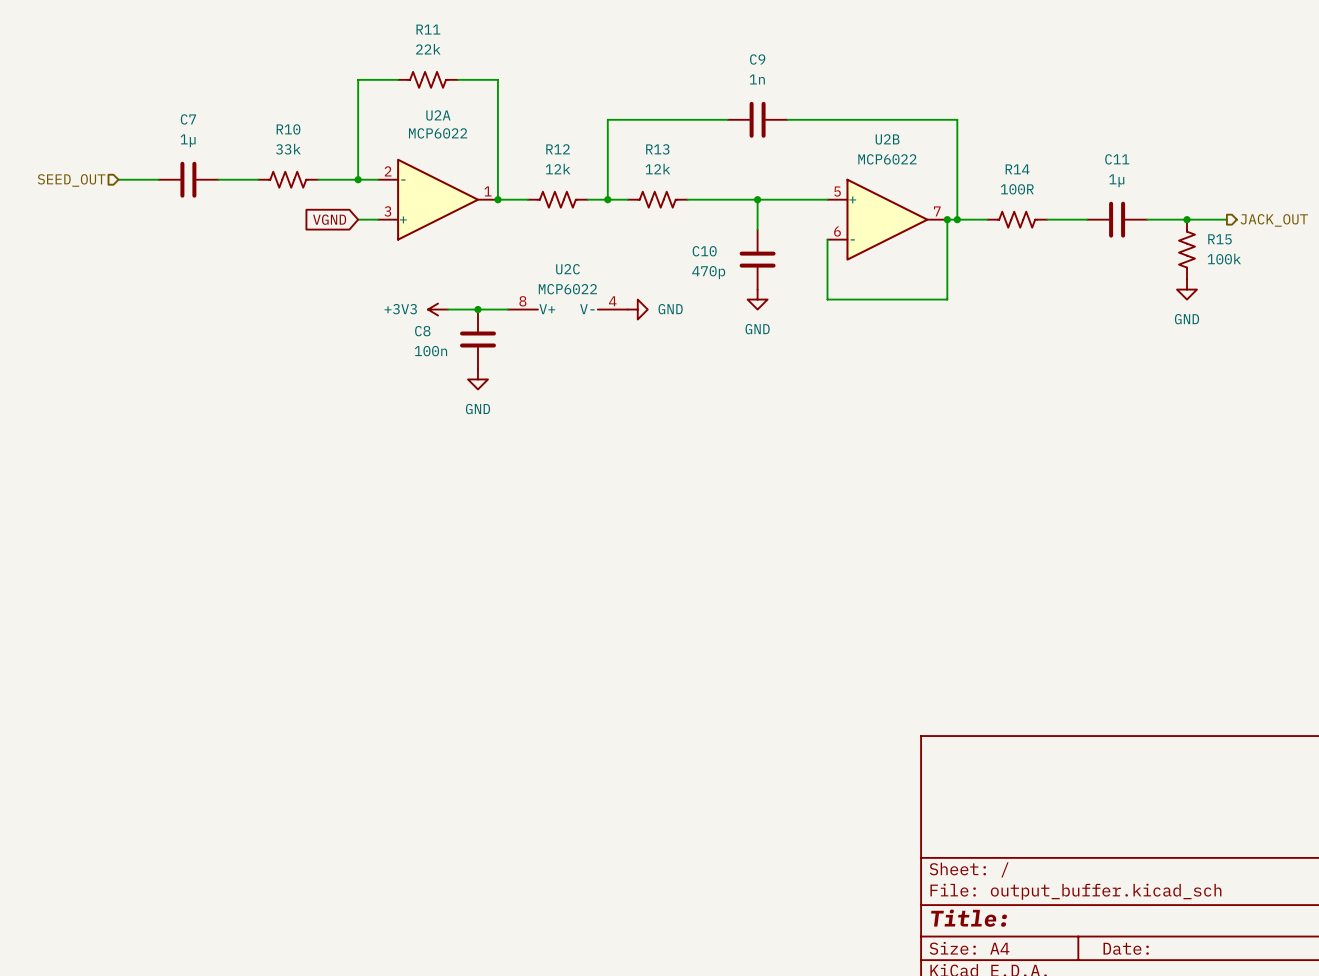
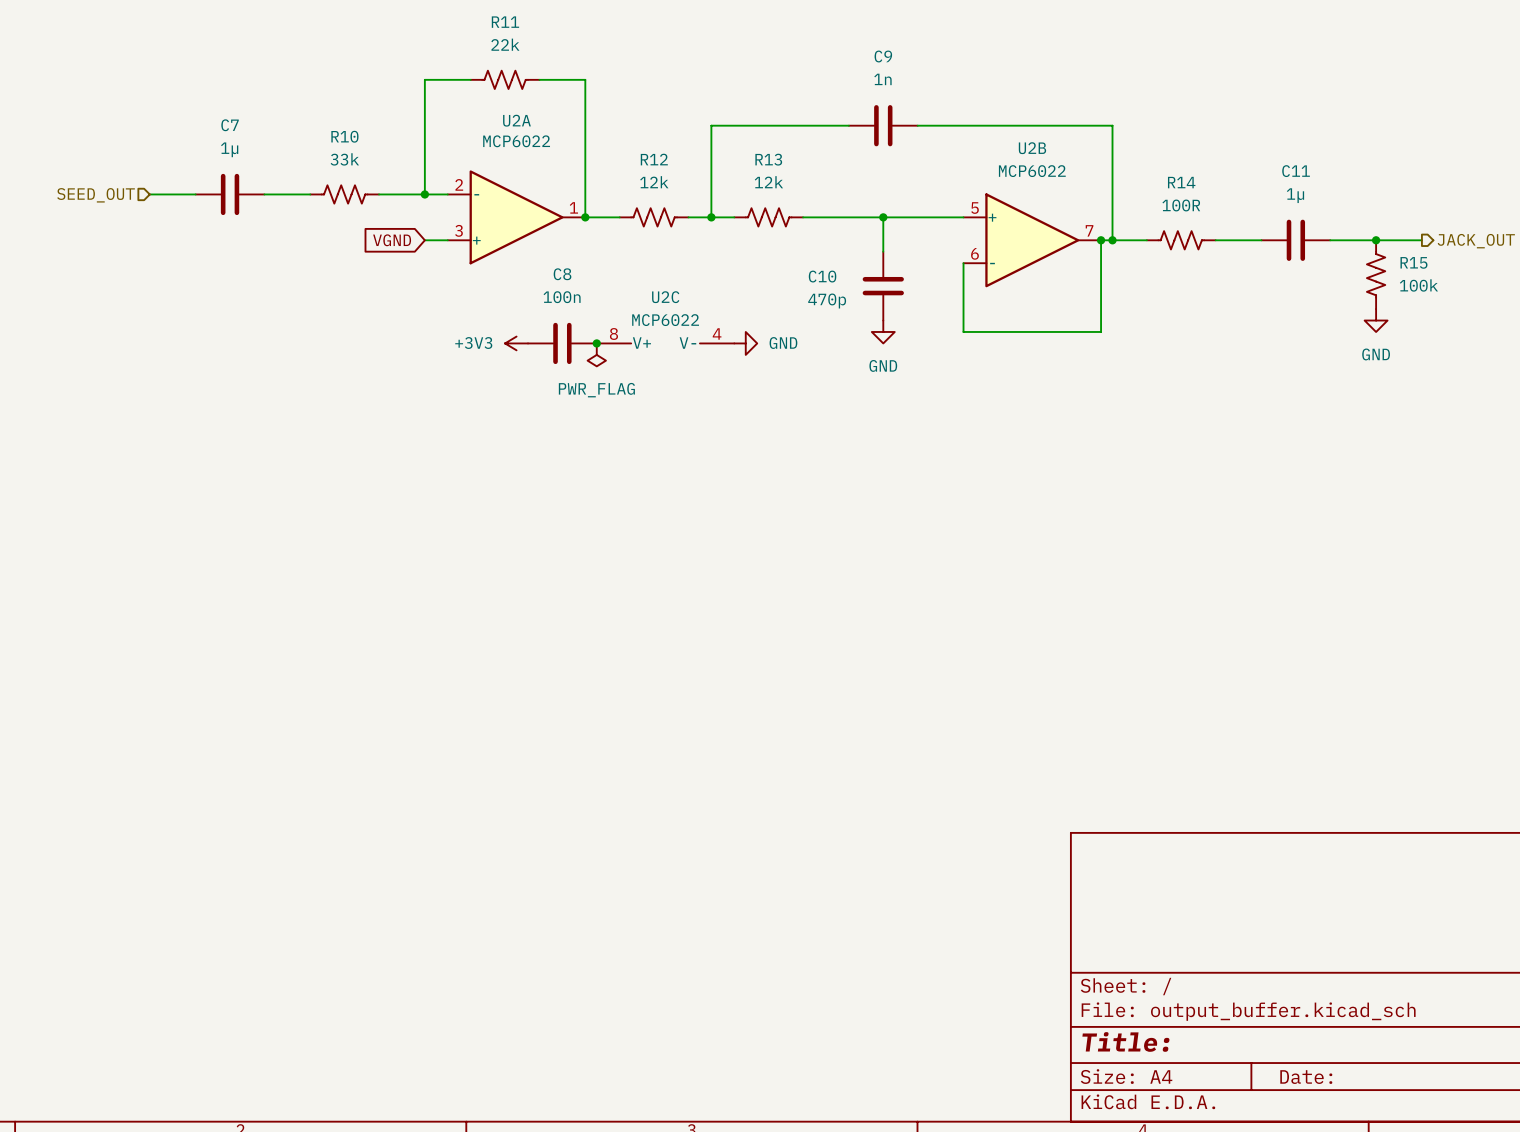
junction position: (477, 309) -> (596, 343)
power symbol: none -> PWR_FLAG (596, 354)
C8 rotation: 0° (477, 339) -> 90° clockwise (562, 343)
power symbol: GND (477, 379) -> none

